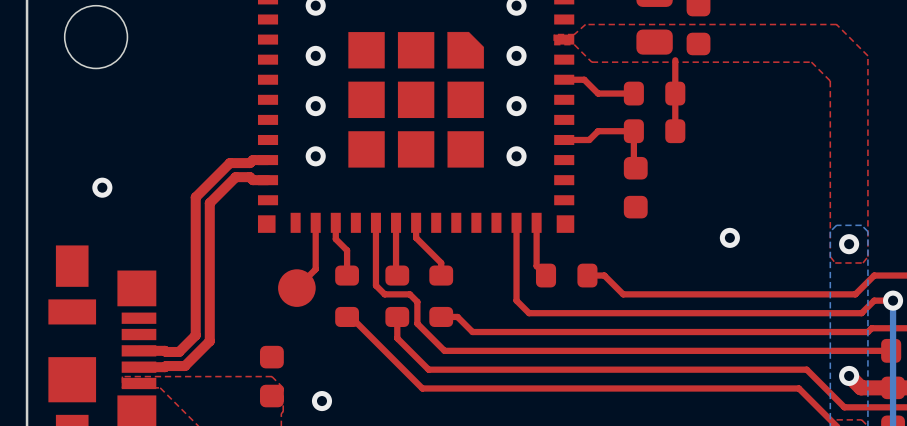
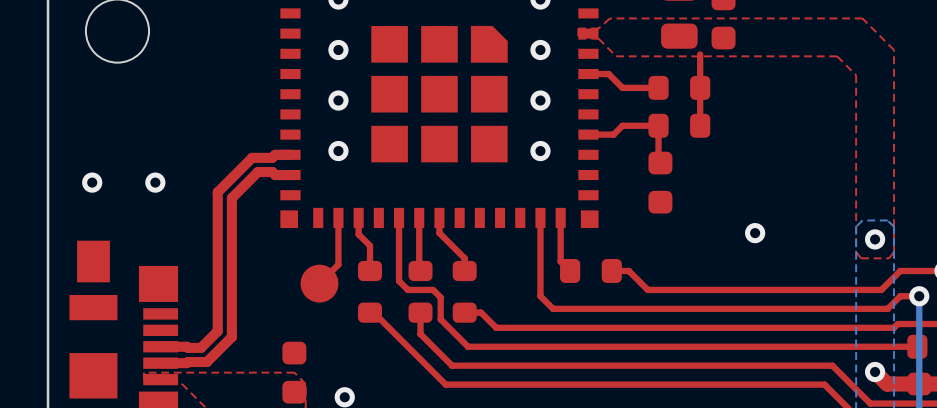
via: none -> (92, 182)
via: (102, 187) -> none
via: none -> (155, 182)

